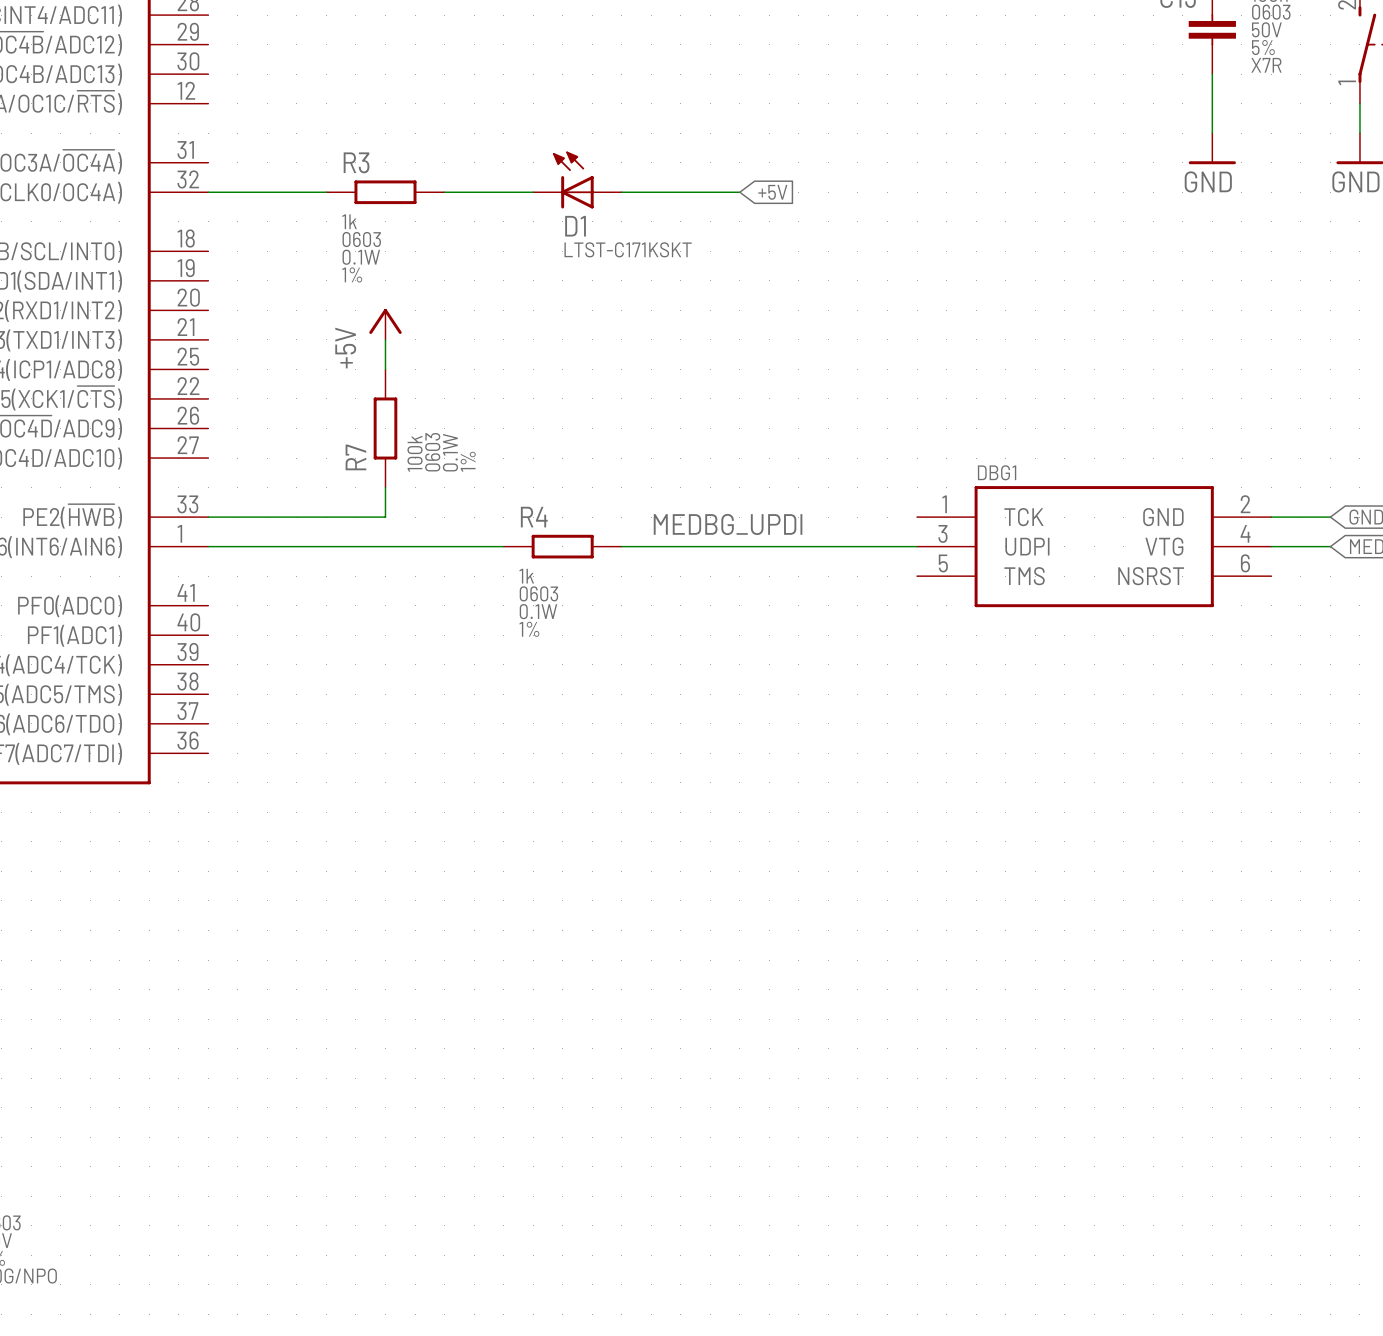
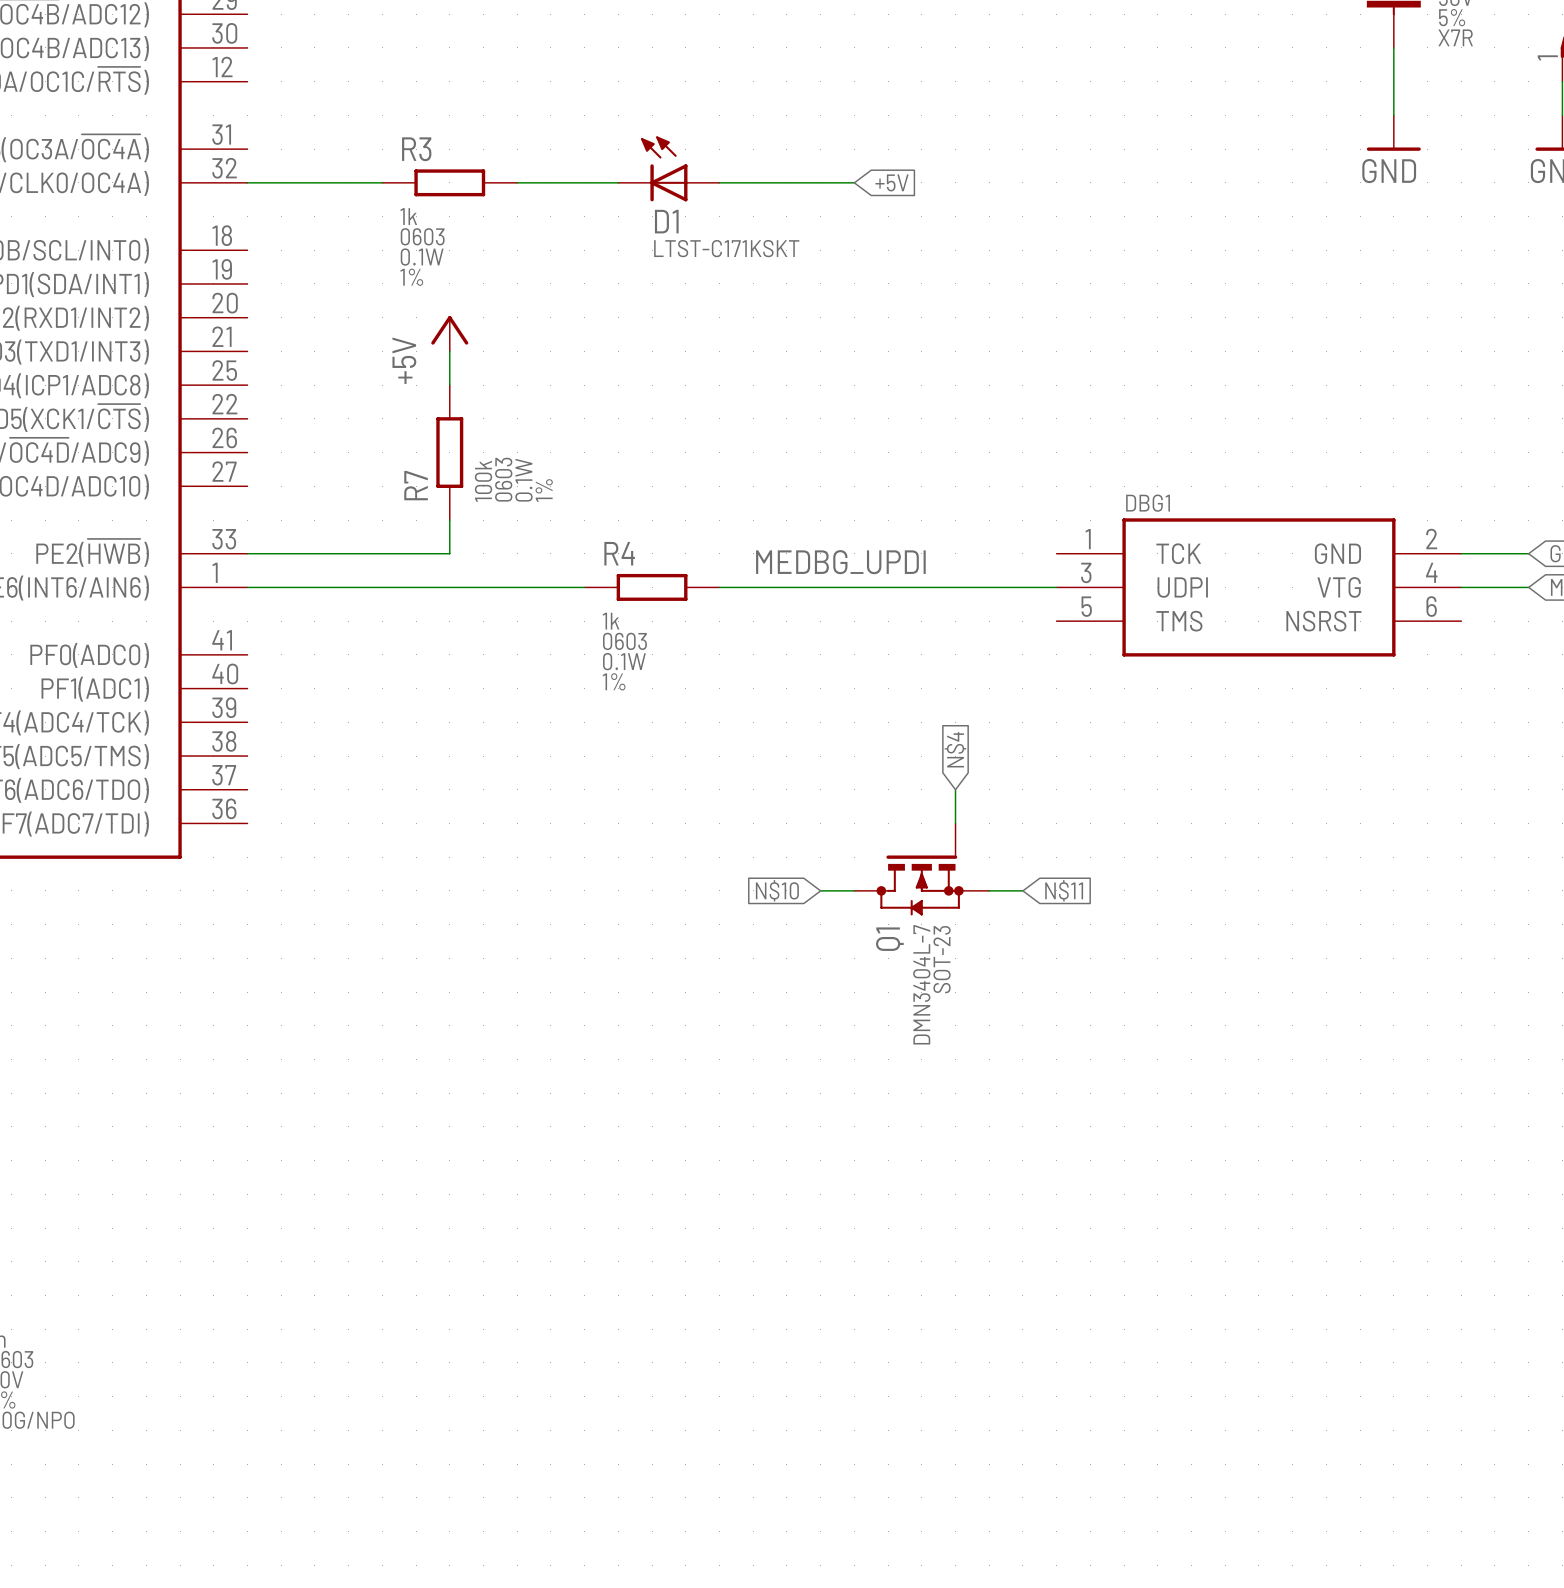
global label: none -> N$4 (955, 749)
wire: none -> (955, 789) (955, 823)
Q1: none -> (921, 869)
global label: none -> N$10 (777, 890)
wire: none -> (820, 890) (854, 890)
wire: none -> (989, 890) (1022, 890)
global label: none -> N$11 (1064, 890)

